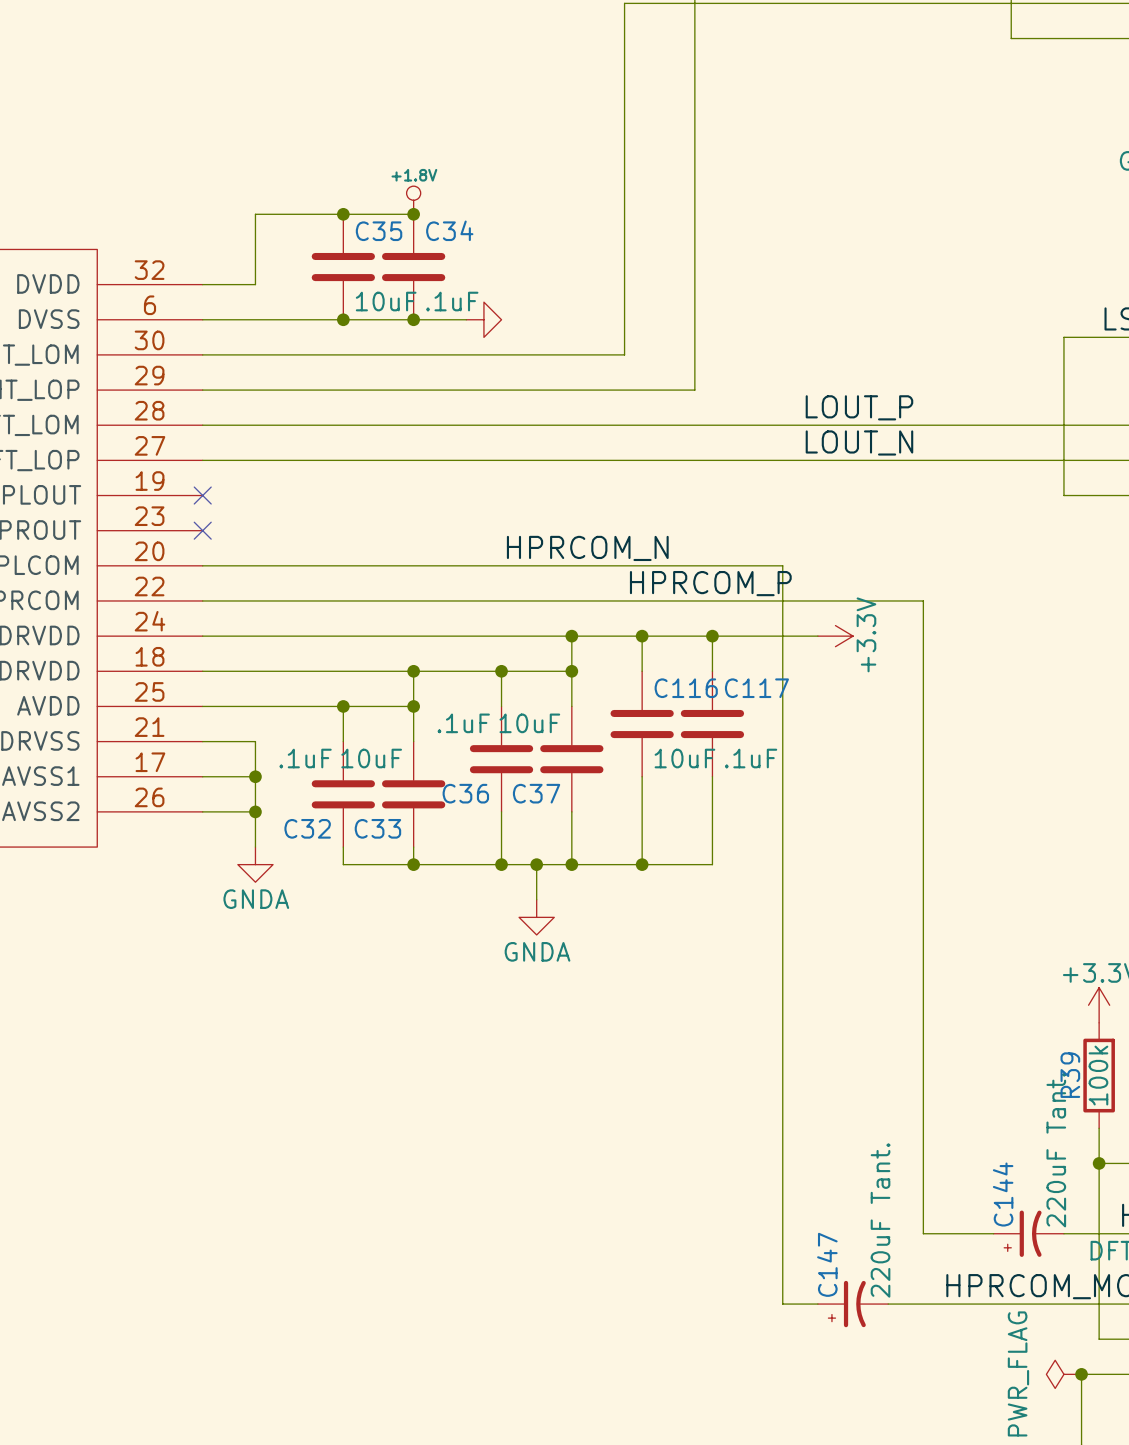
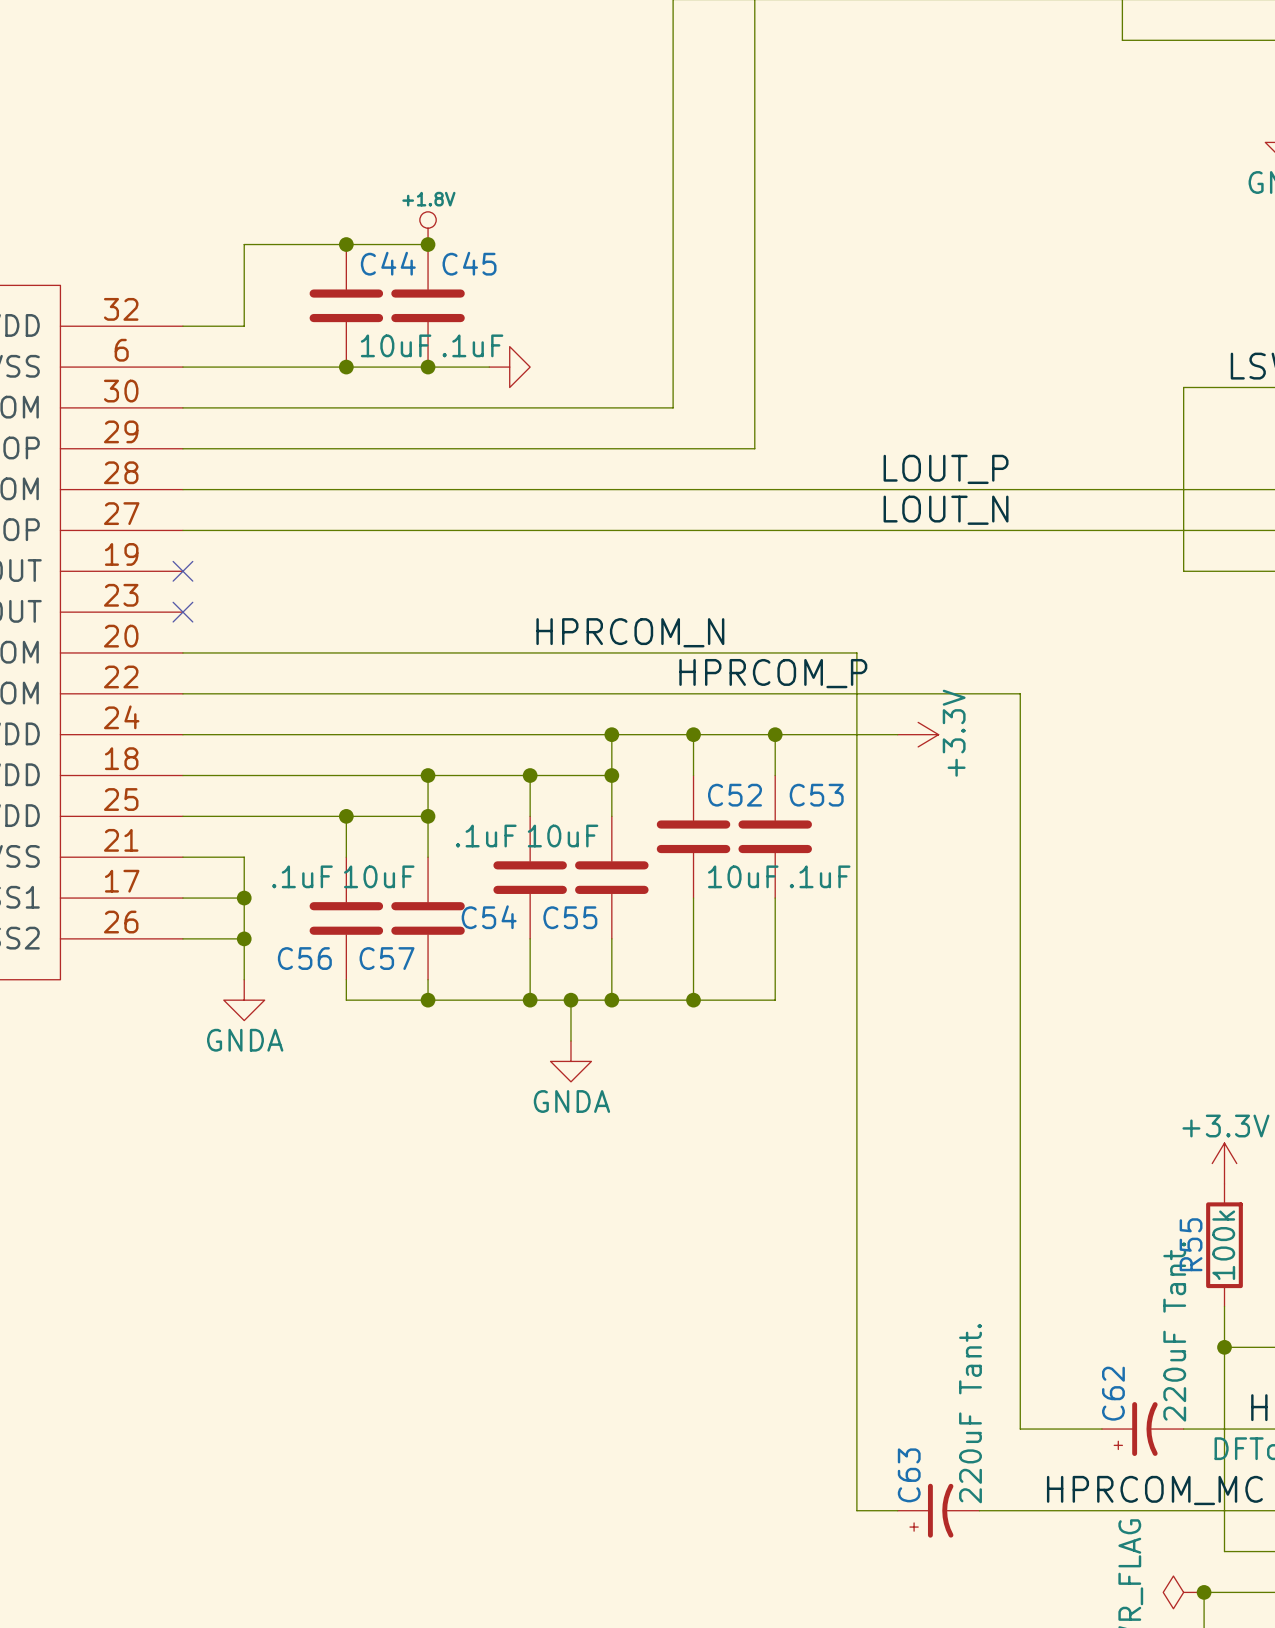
C34 name: C34 (449, 230) -> C45 (469, 263)
C35 name: C35 (379, 231) -> C44 (388, 263)
C116 name: C116 (686, 688) -> C52 (735, 795)
C117 name: C117 (756, 688) -> C53 (816, 795)
C36 name: C36 (465, 793) -> C54 (489, 917)
C37 name: C37 (536, 793) -> C55 (570, 917)
C32 name: C32 (307, 828) -> C56 (304, 958)
C33 name: C33 (377, 828) -> C57 (387, 958)
R39 name: R39 (1070, 1075) -> R55 (1191, 1244)
C144 name: C144 (1003, 1194) -> C62 (1113, 1393)
C147 name: C147 (827, 1264) -> C63 (909, 1475)

